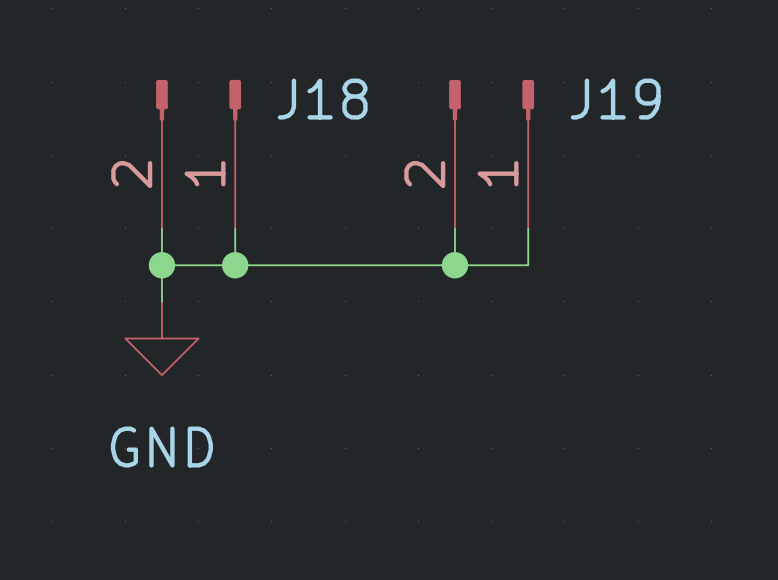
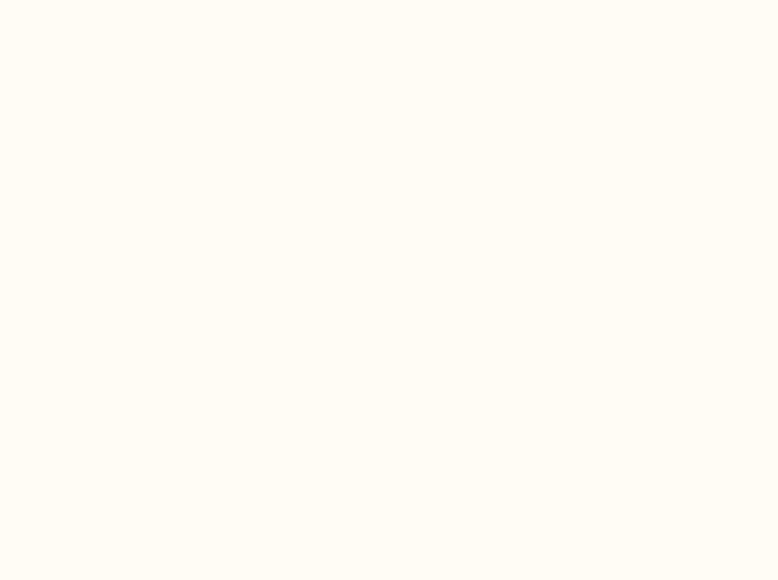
J18: (198, 154) -> none
J19: (491, 154) -> none
wire: (161, 228) (161, 301) -> none
wire: (235, 228) (235, 265) -> none
wire: (454, 228) (454, 265) -> none
wire: (528, 228) (528, 265) (161, 265) -> none
junction: (161, 265) -> none
junction: (235, 265) -> none
junction: (454, 265) -> none
power symbol: GND (161, 338) -> none

